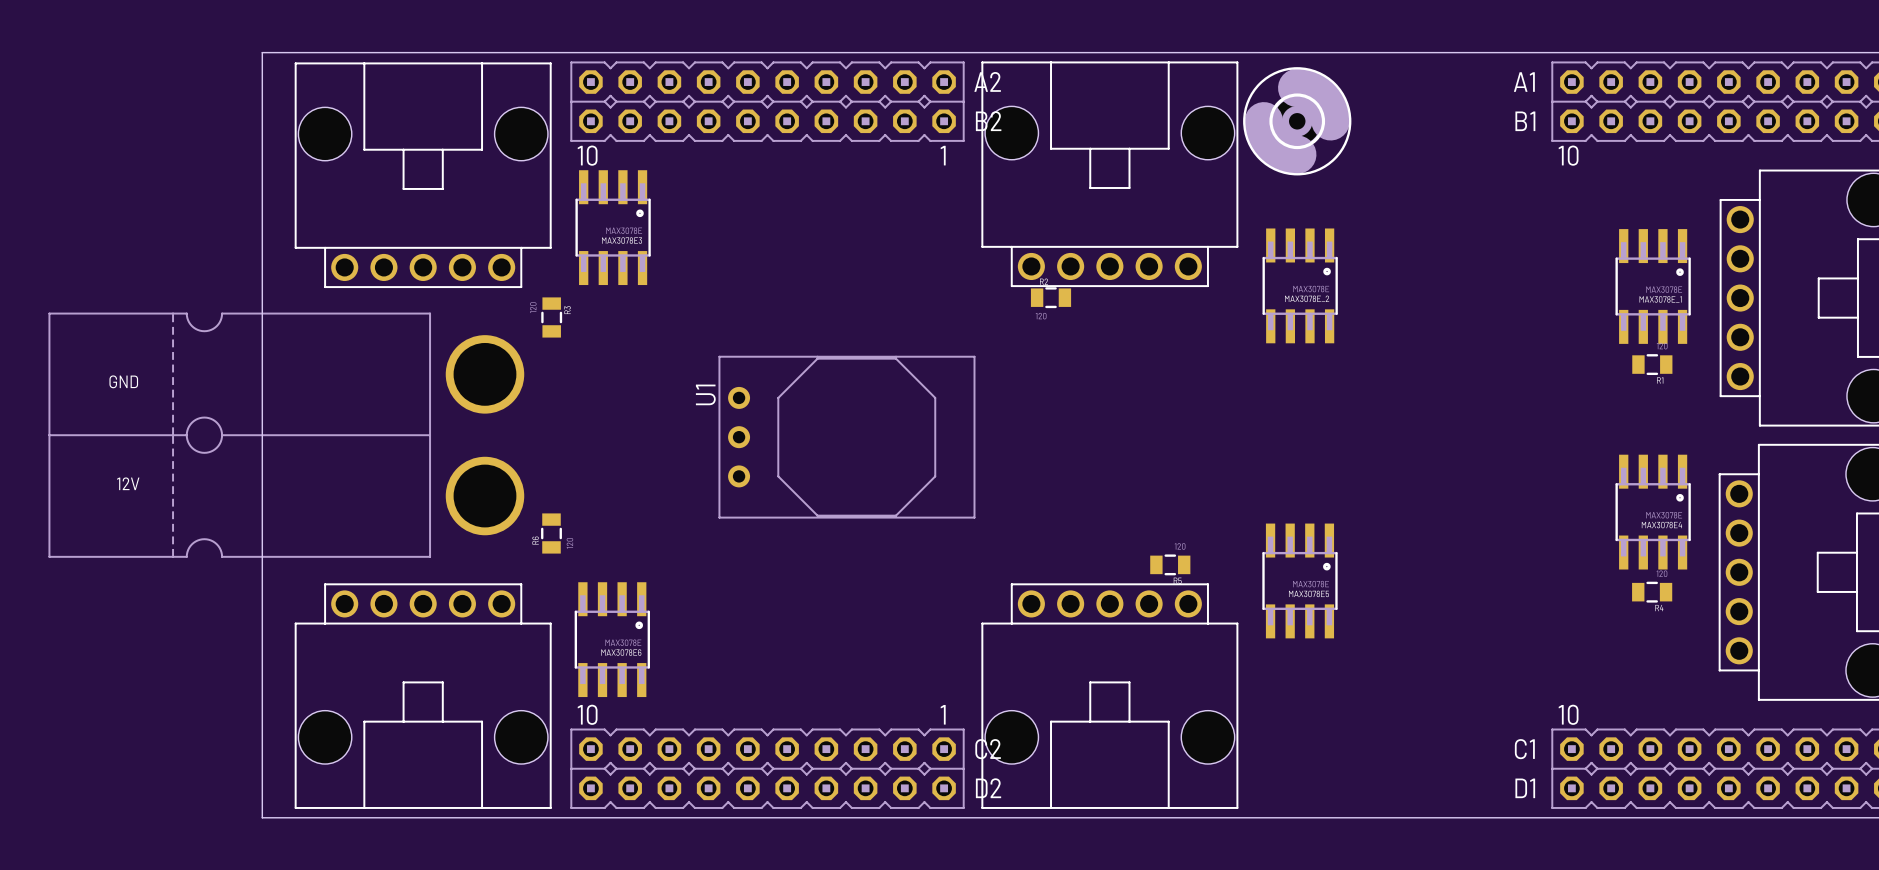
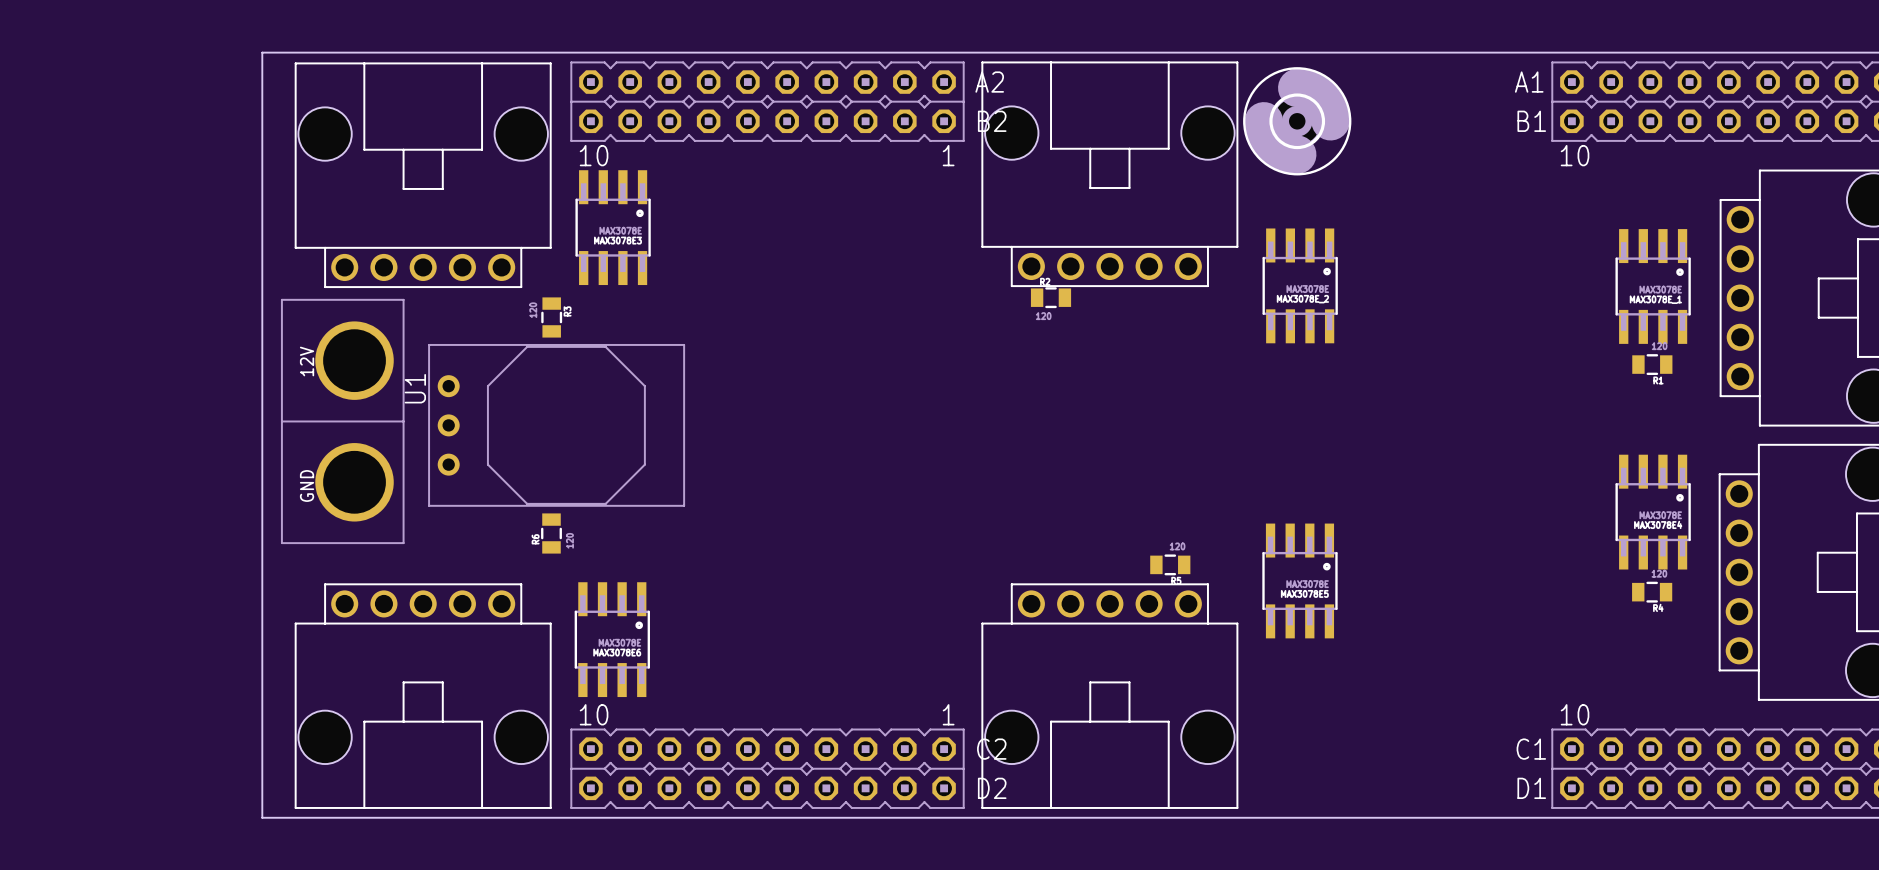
part: none -> (342, 421)
part: (286, 435) -> none
U1 position: (846, 437) -> (556, 425)

